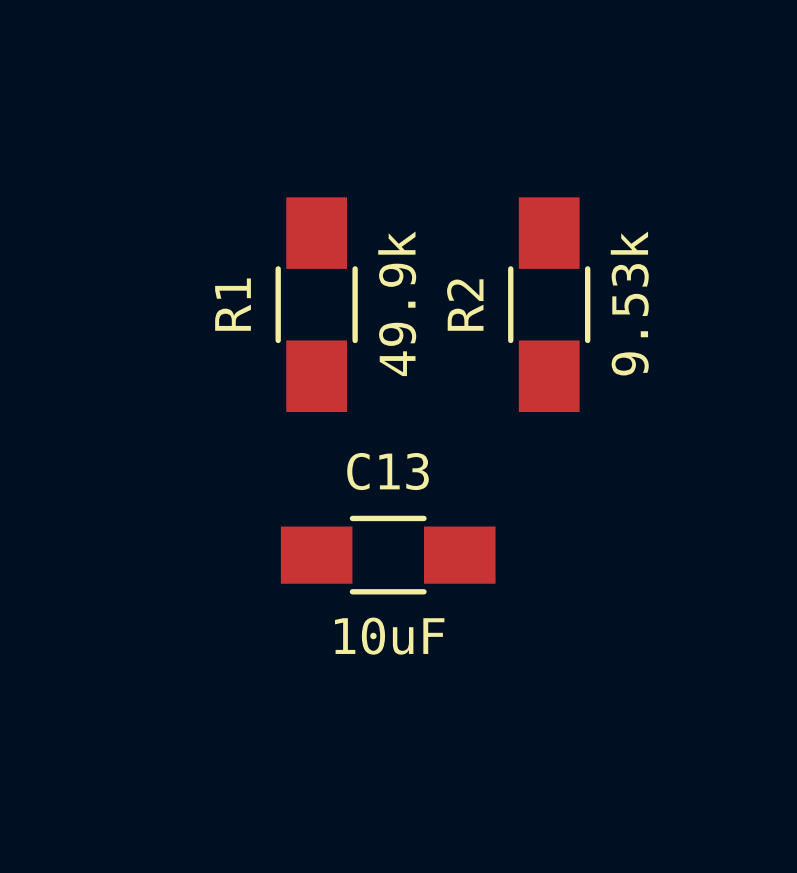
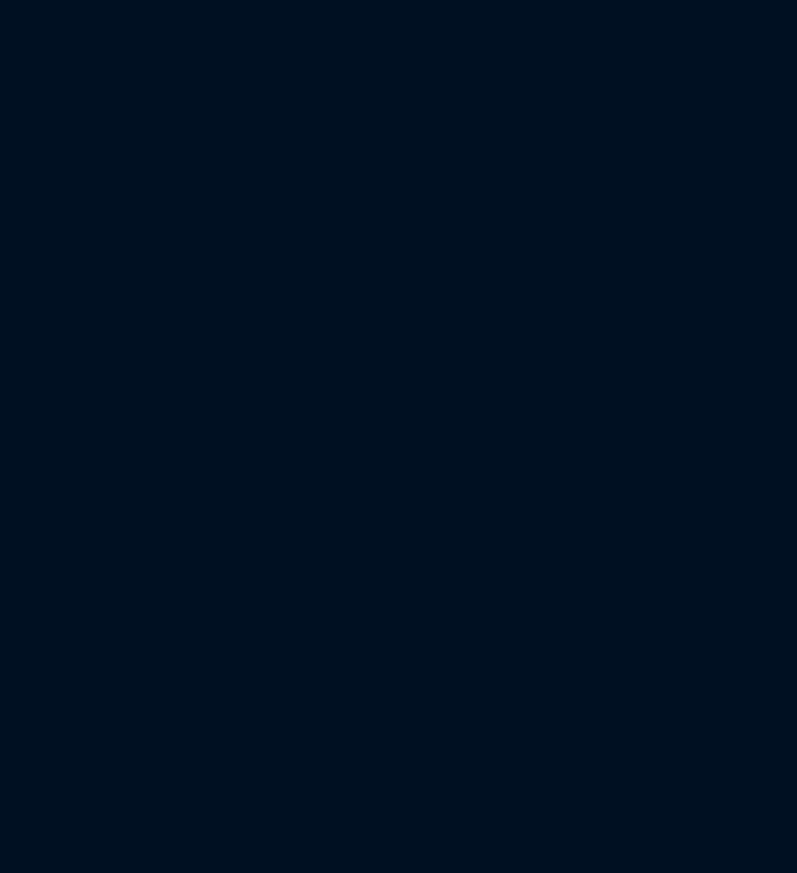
R1: 49.9k (316, 304) -> none
R2: 9.53k (549, 304) -> none
C13: 10uF (388, 555) -> none

